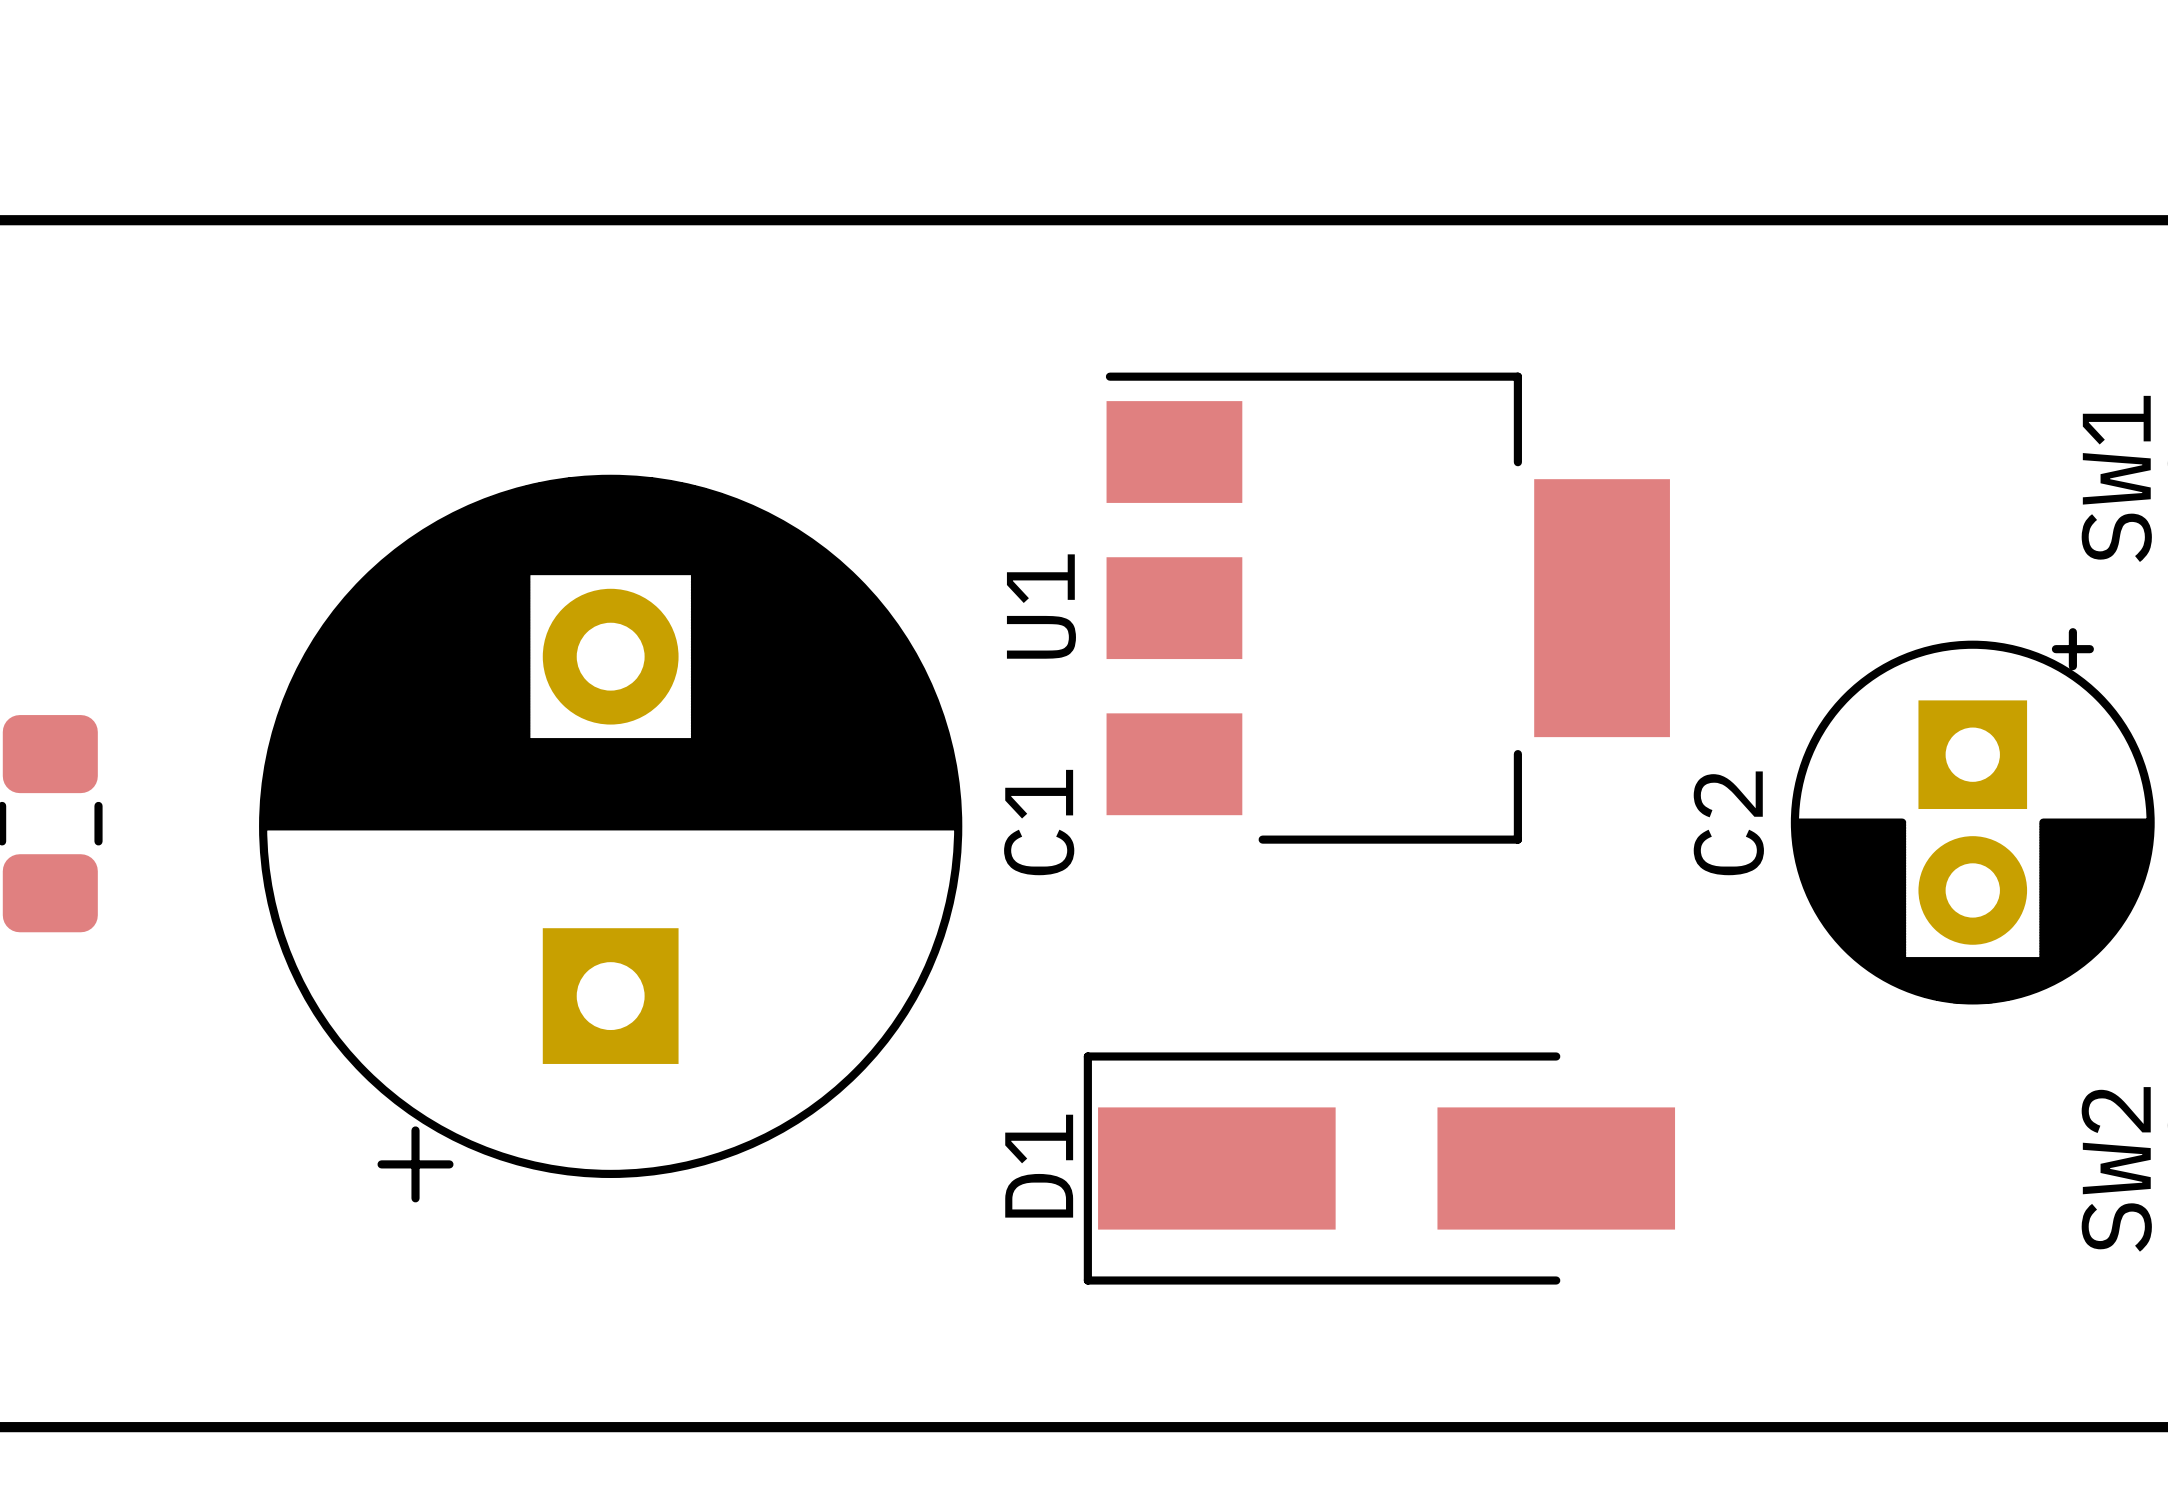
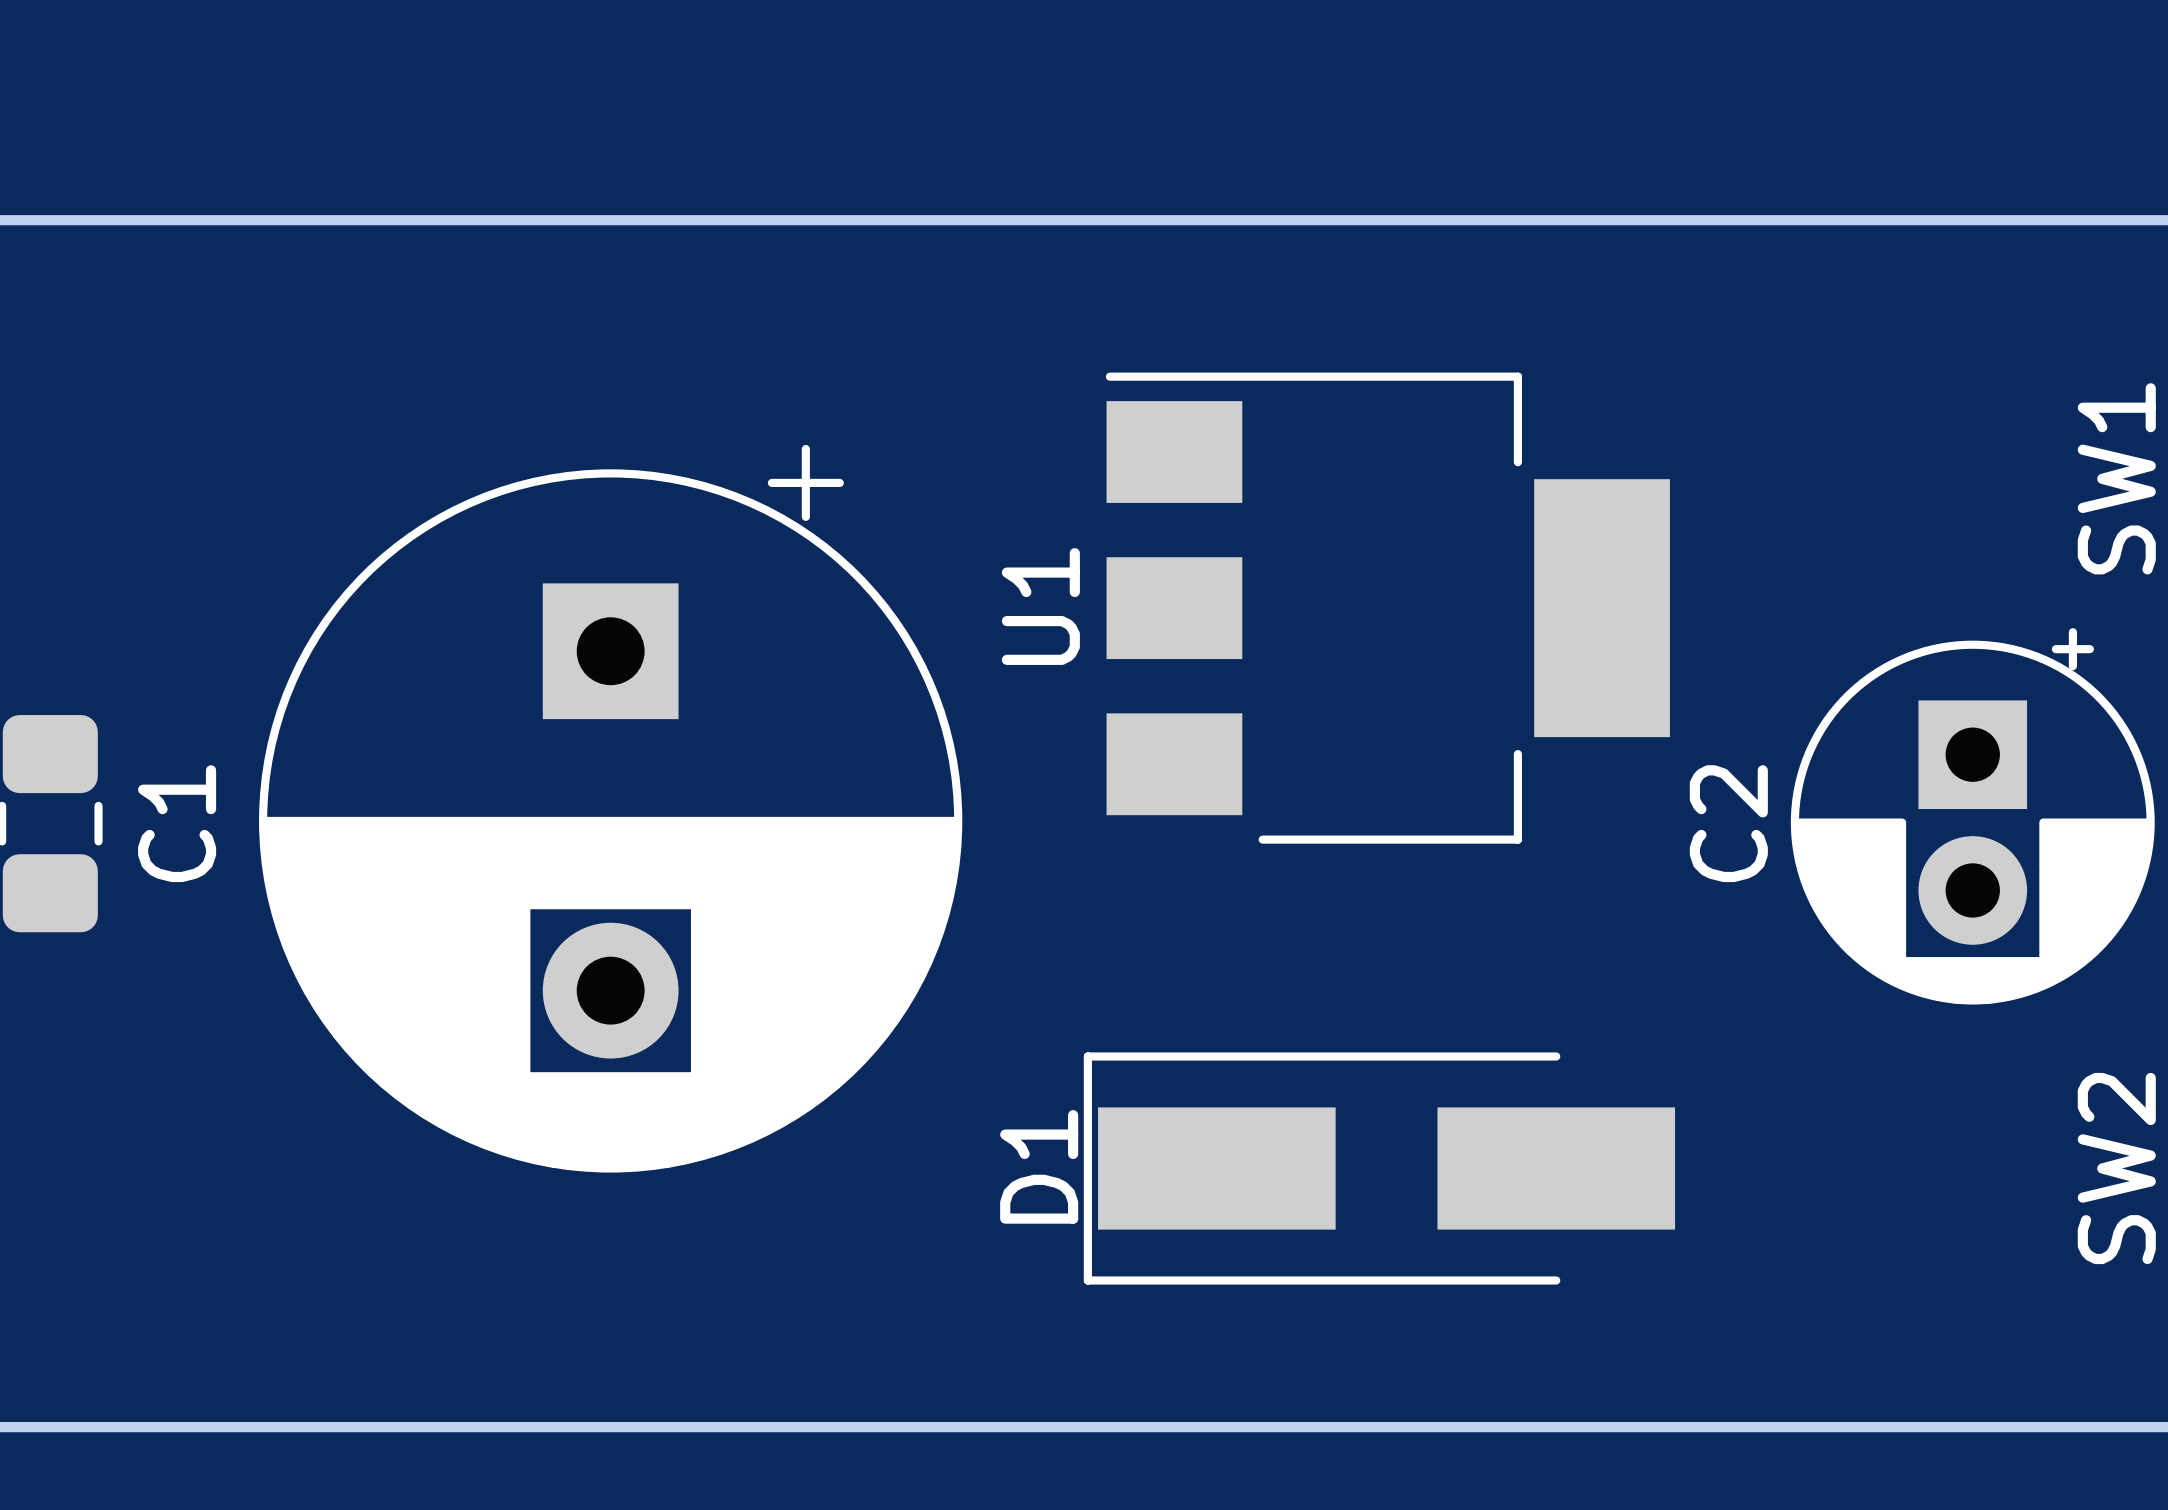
C1 rotation: 0° (610, 838) -> 180° (610, 808)

